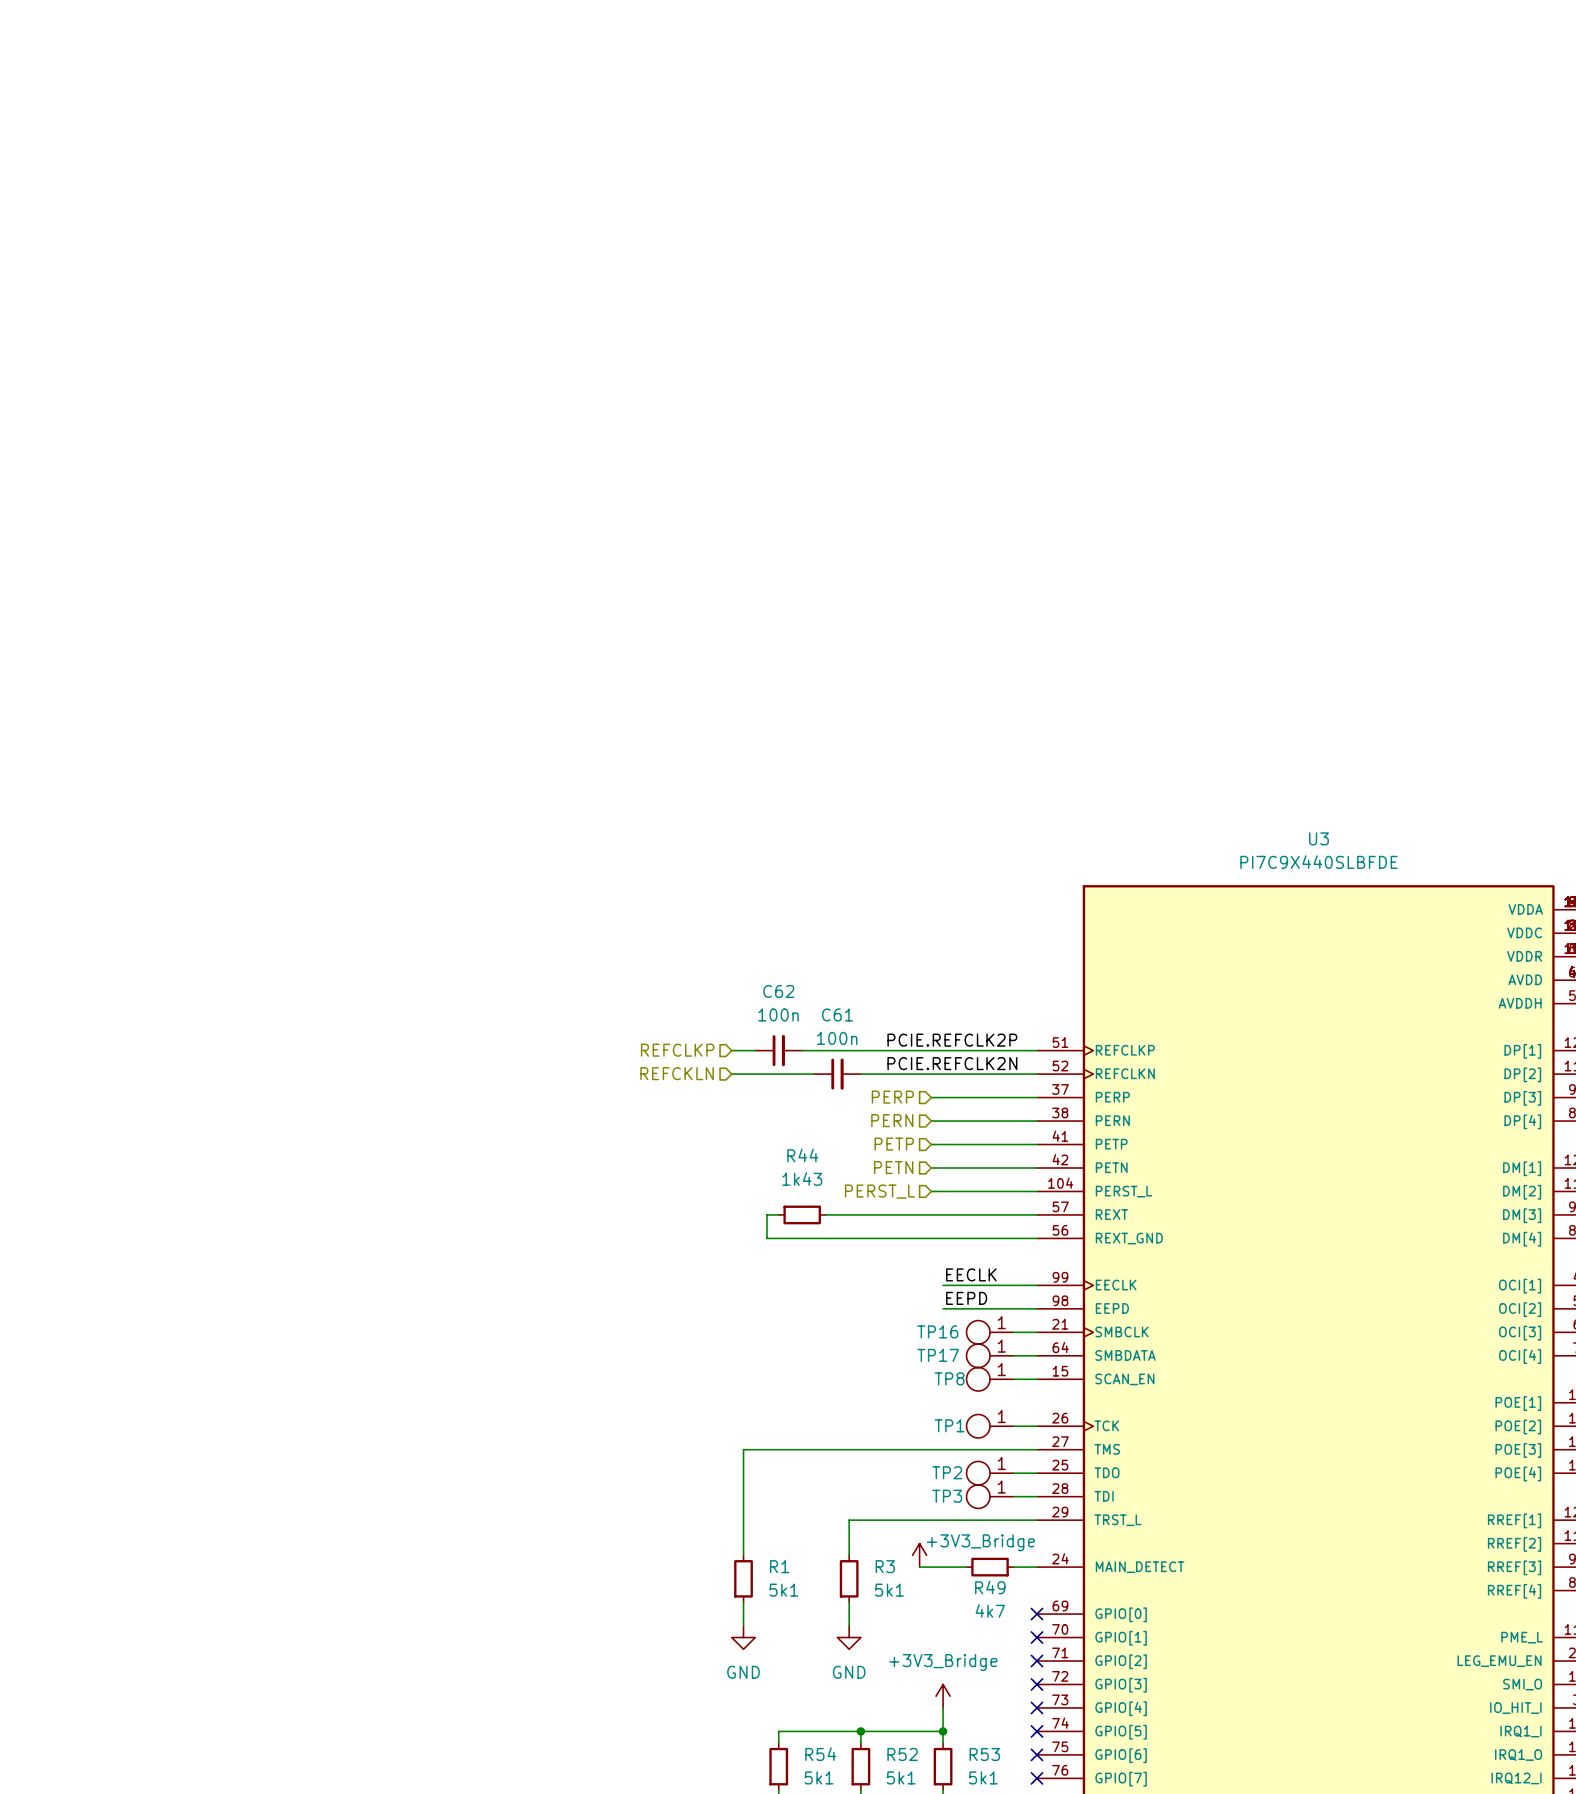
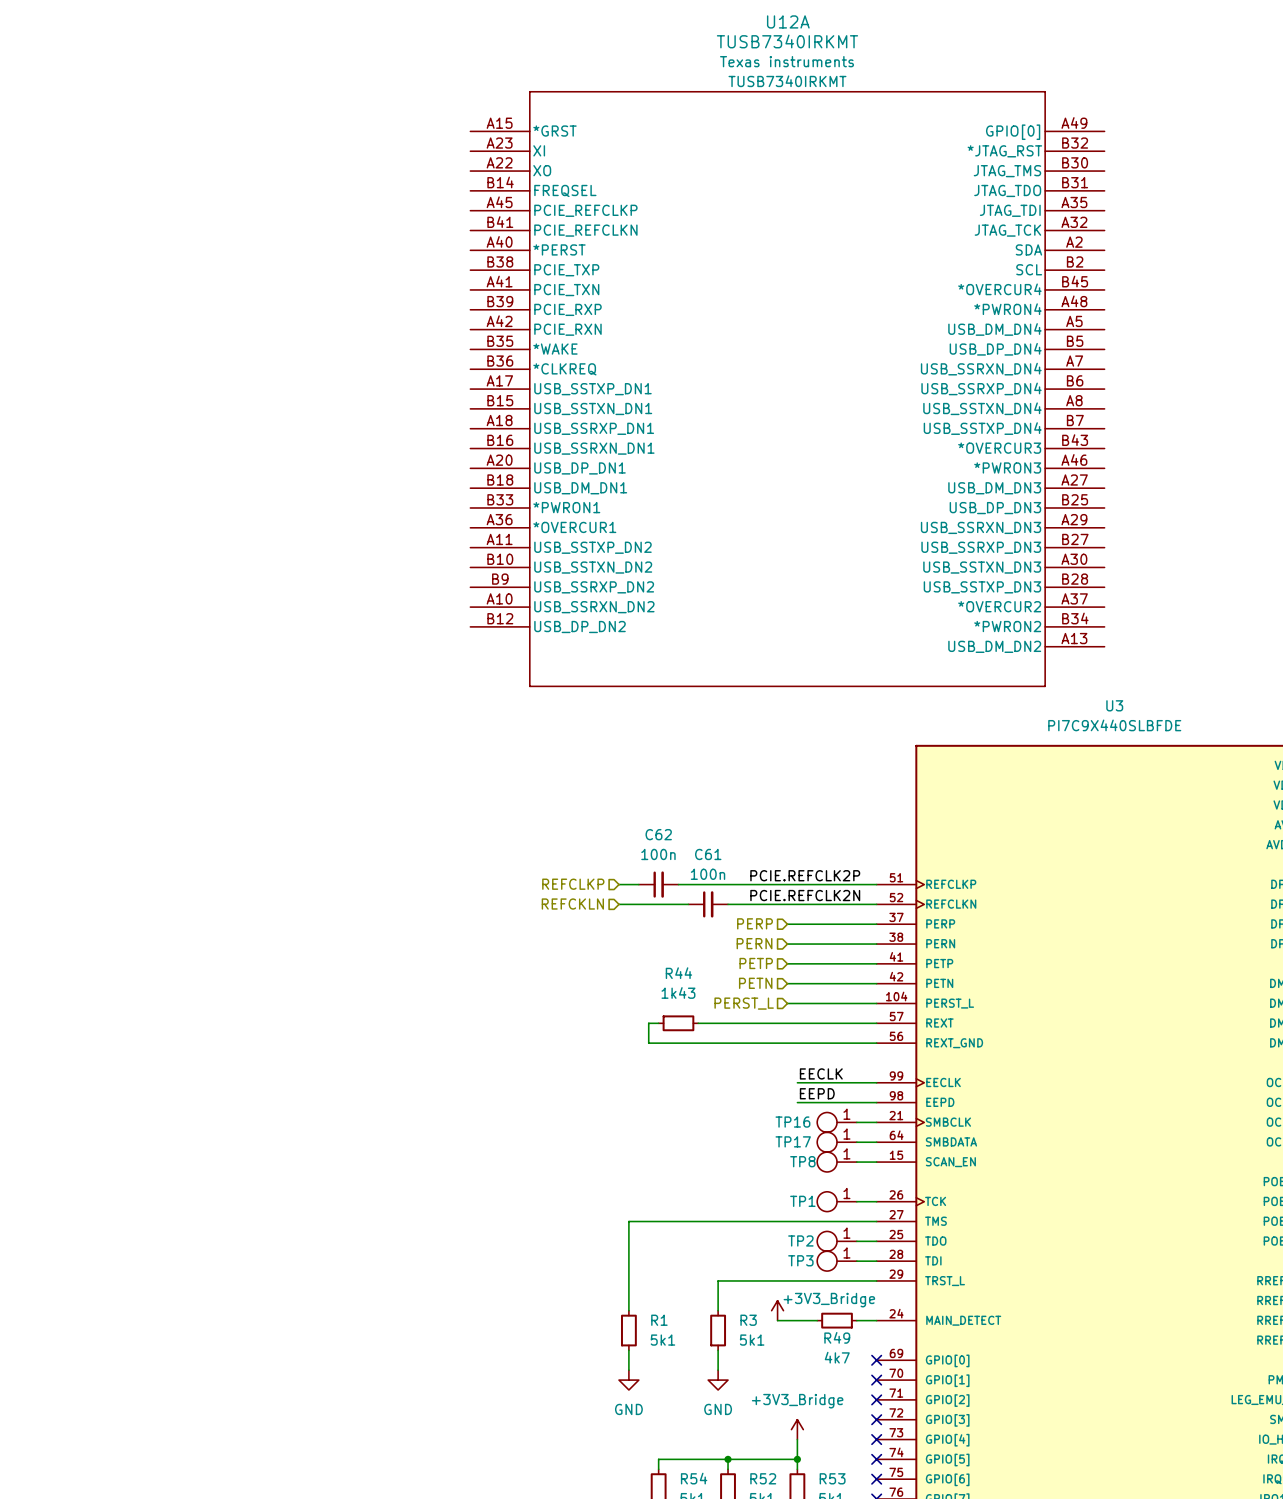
U12A: none -> TUSB7340IRKMT (787, 389)

